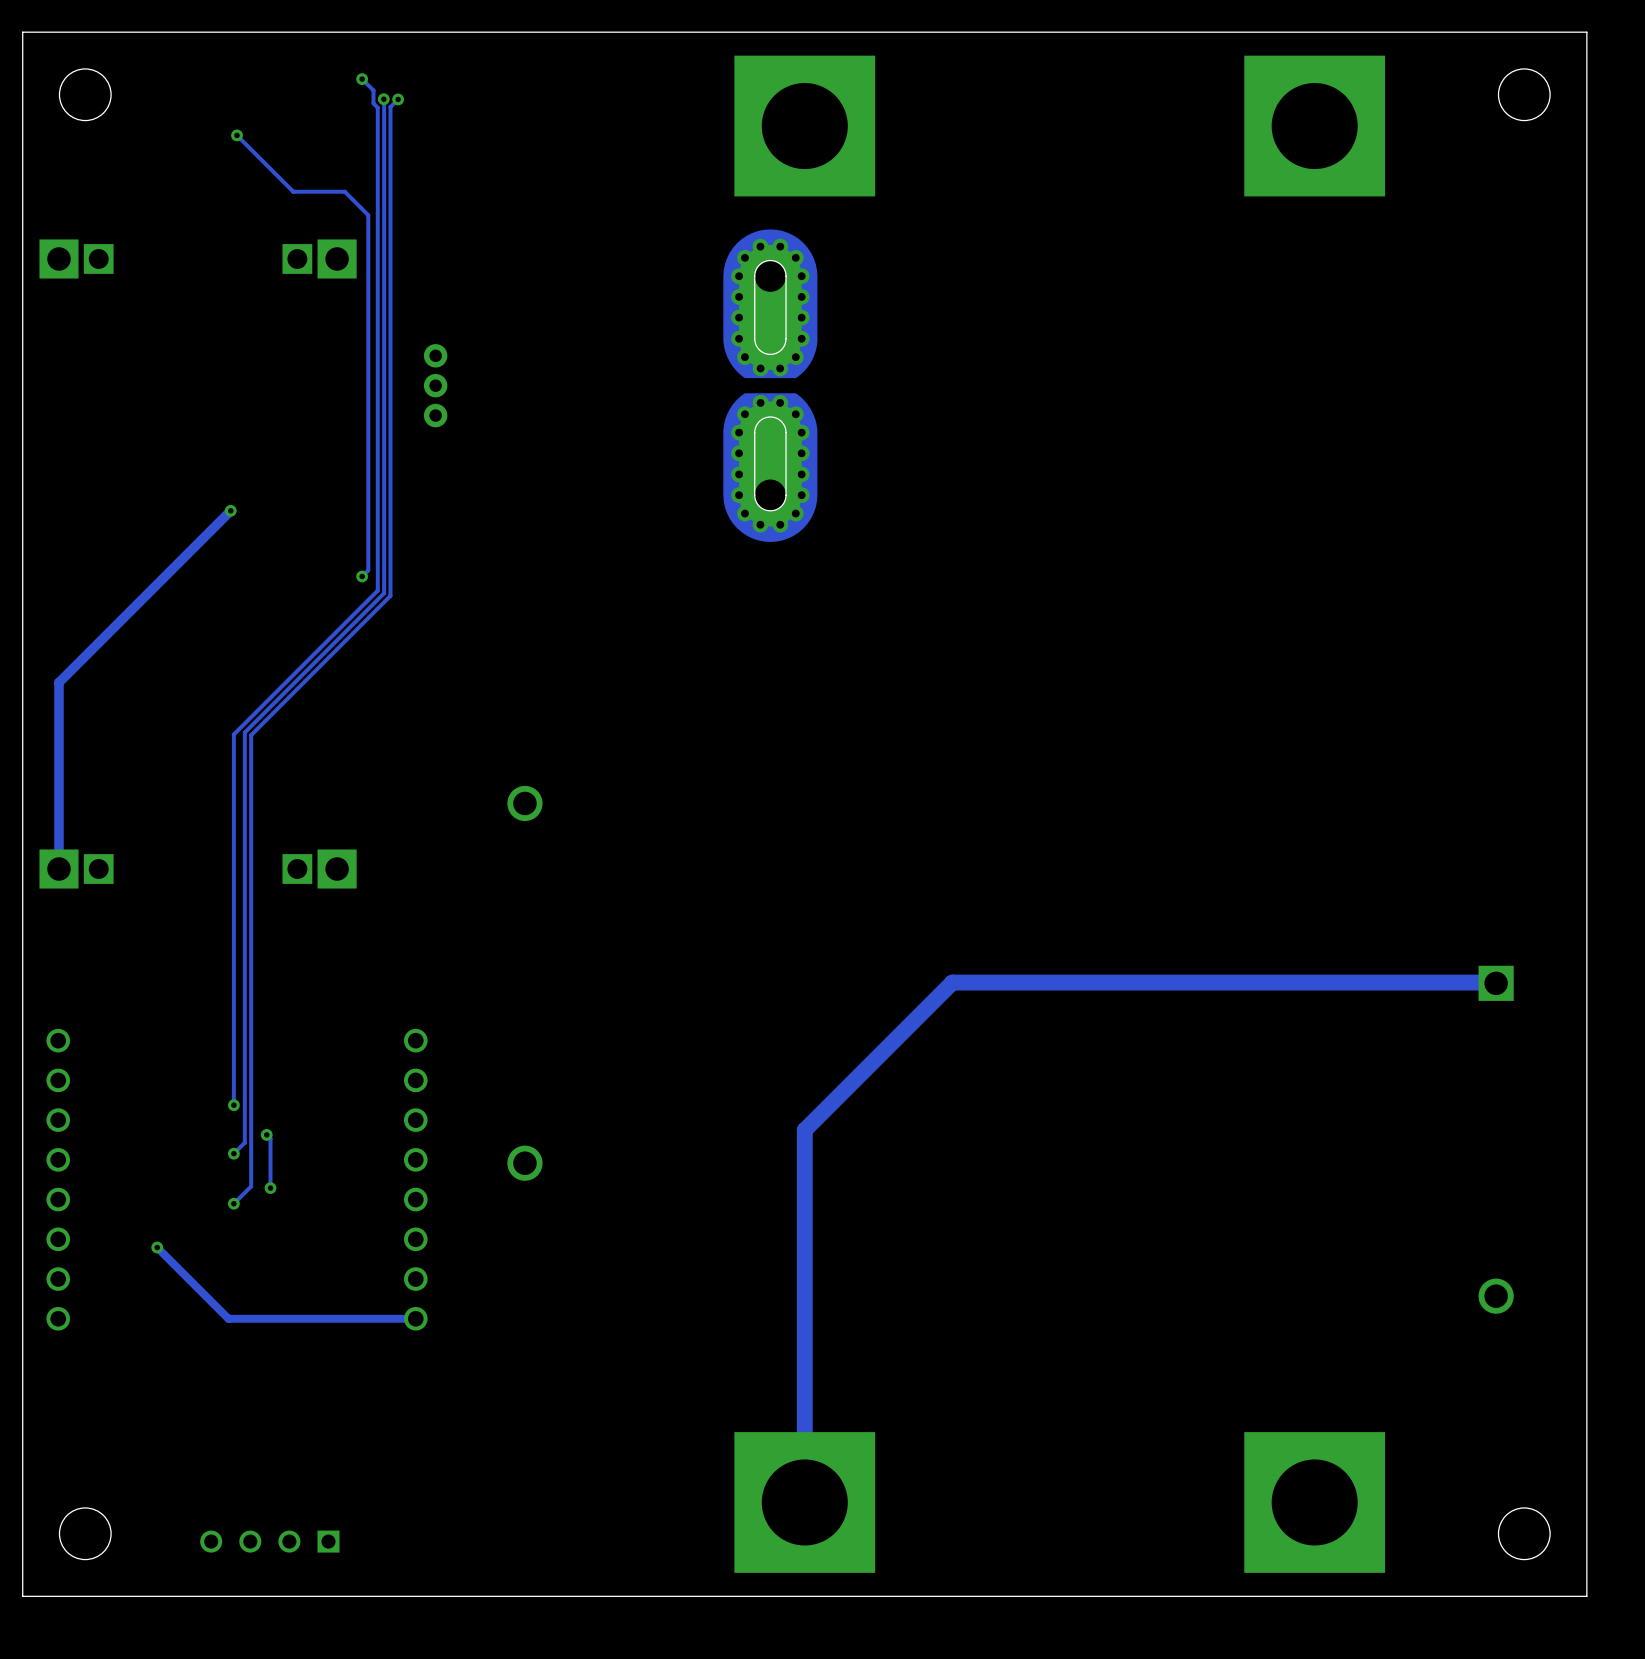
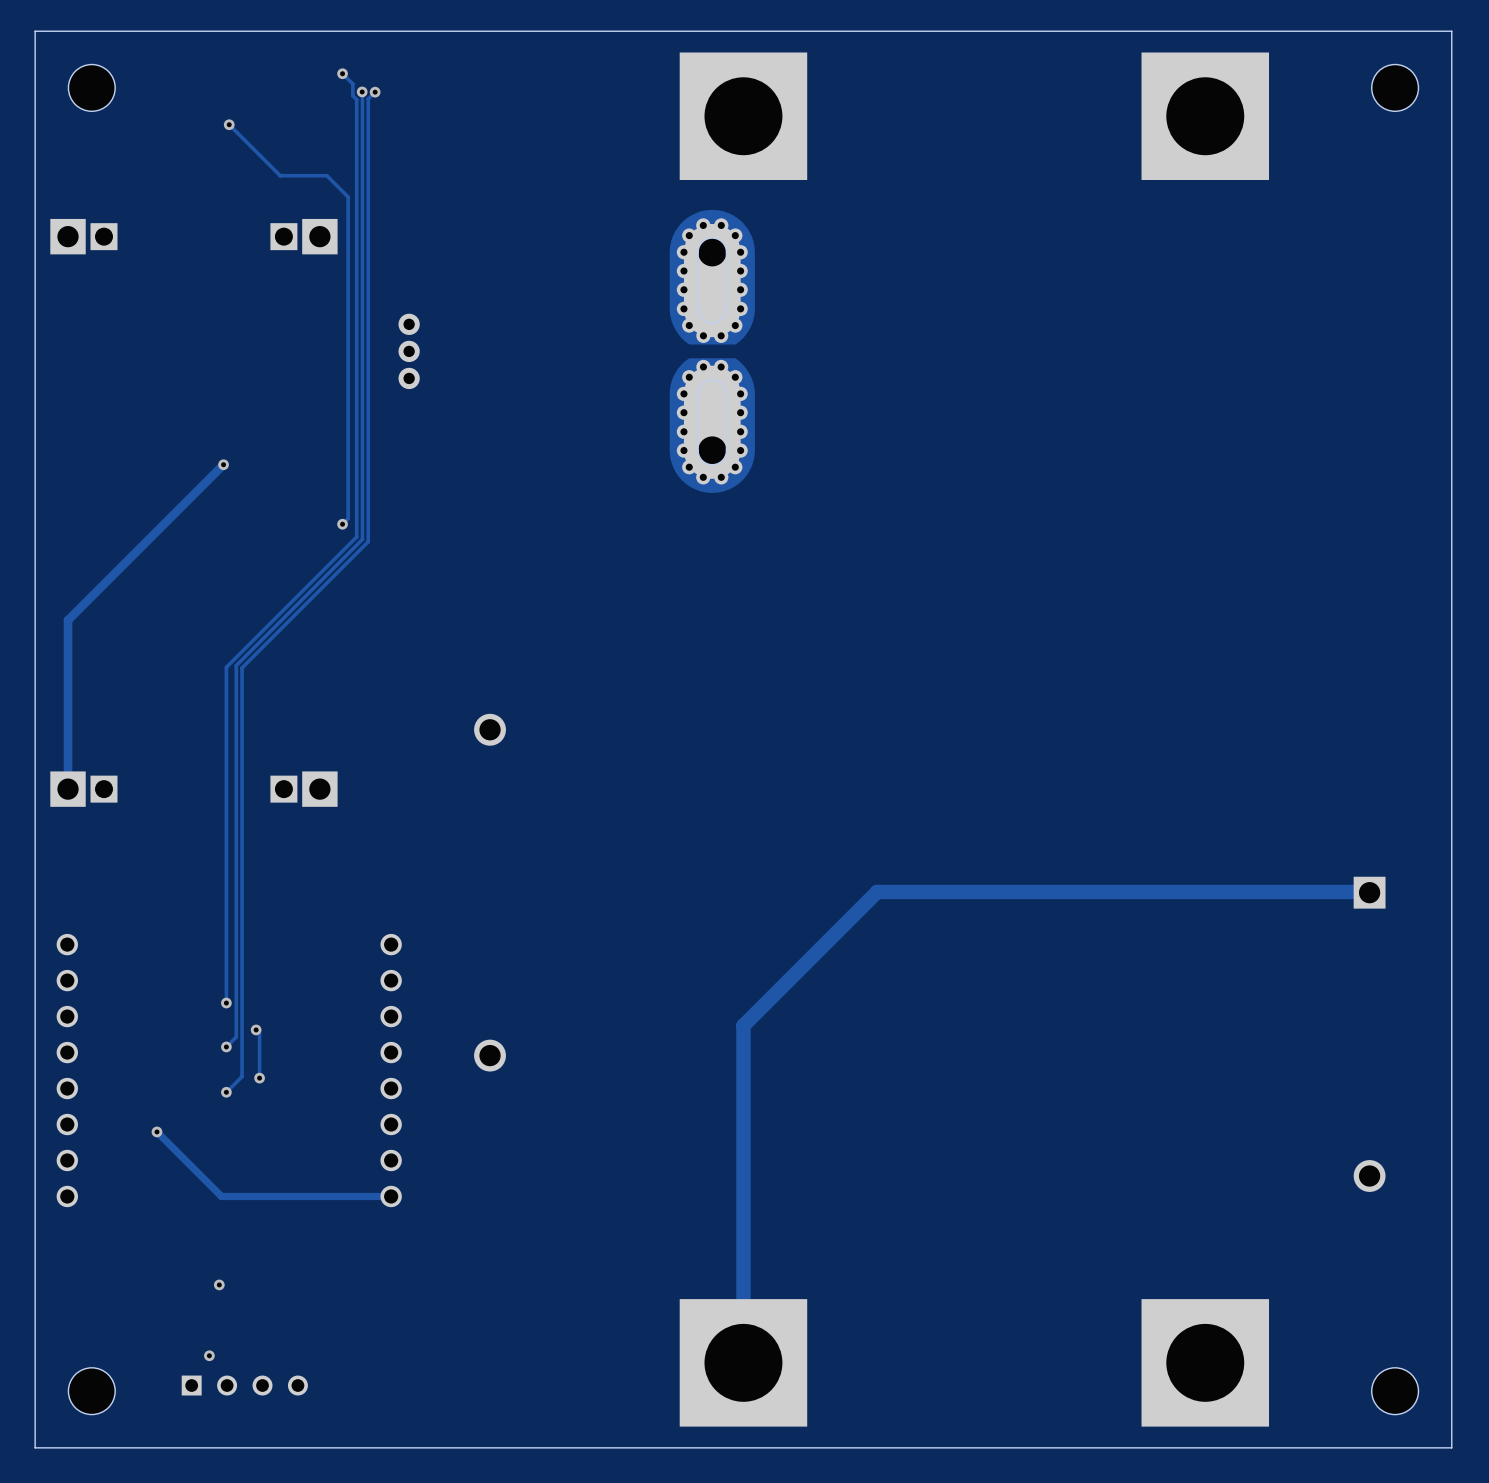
via: none -> (219, 1284)
via: none -> (209, 1355)
part rotation: 0° (269, 1541) -> 180° (244, 1385)

